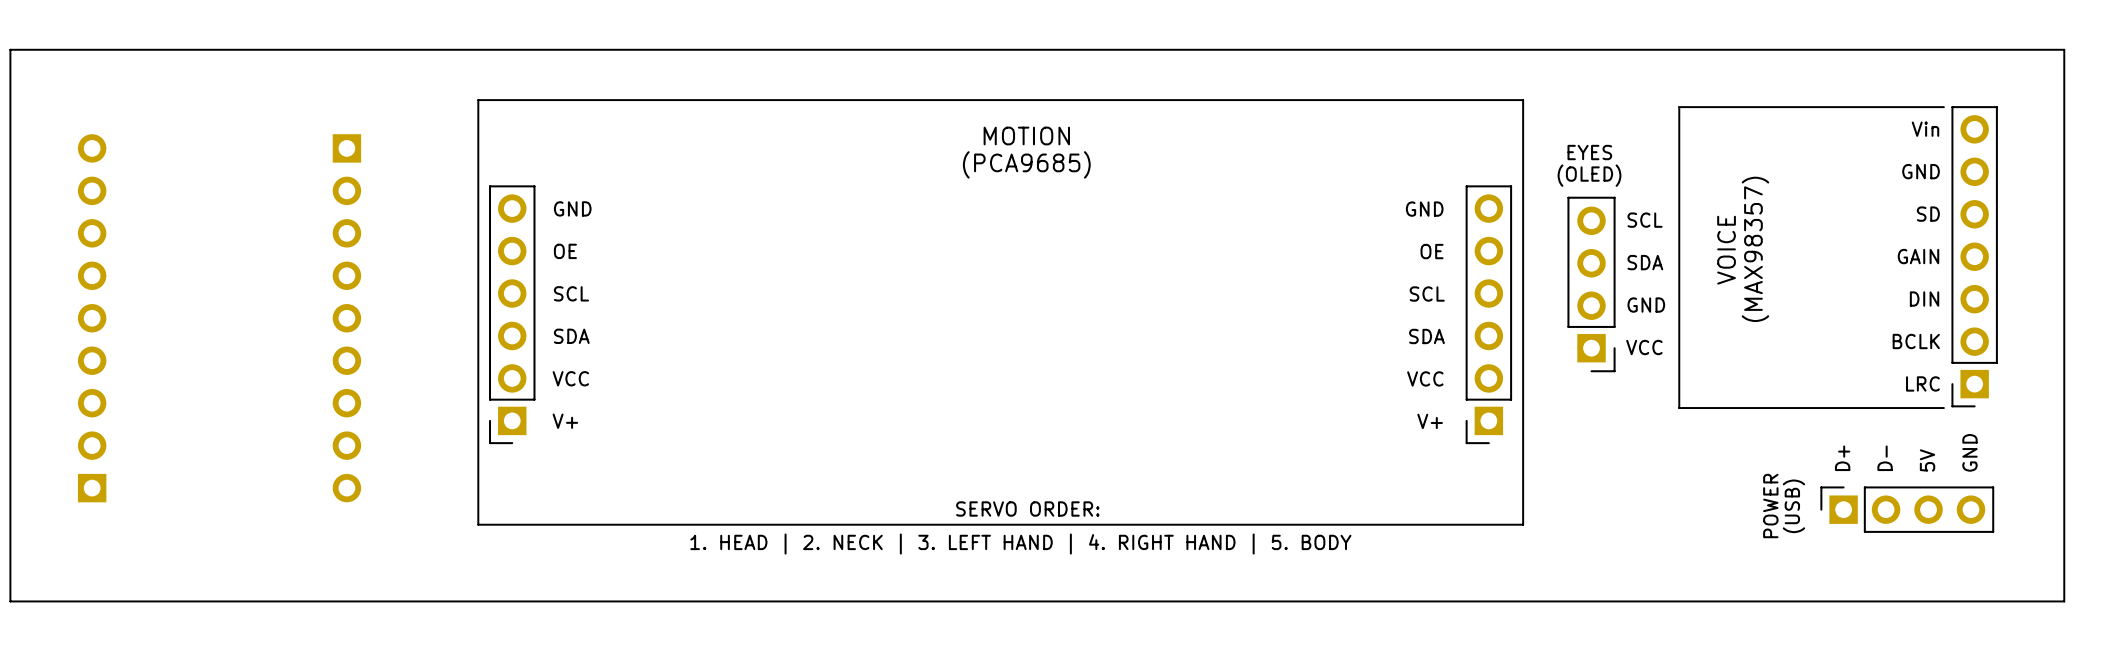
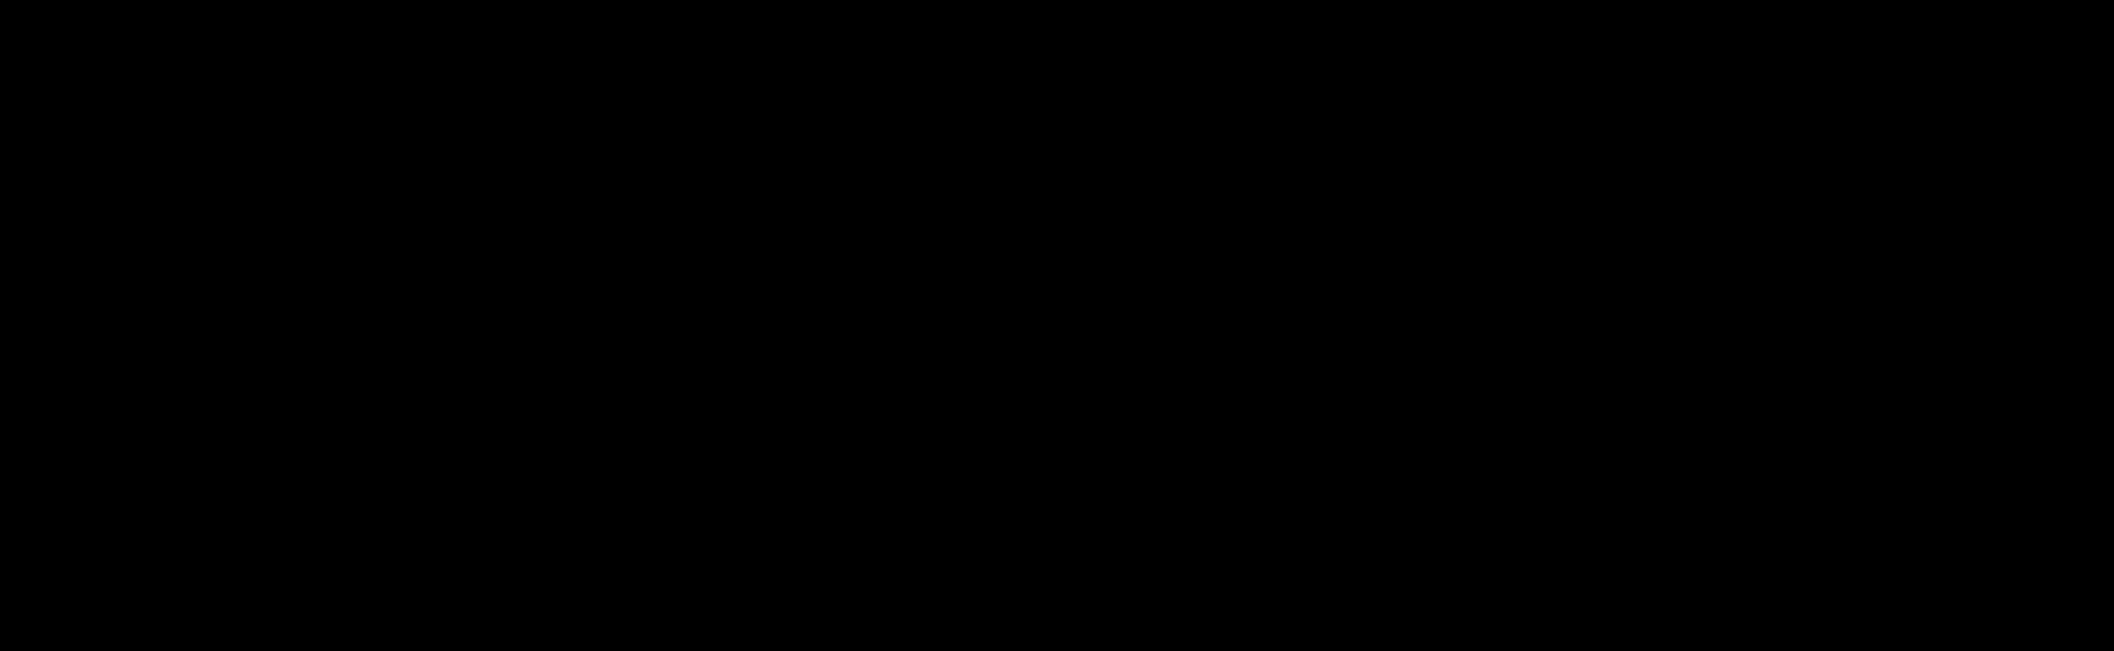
board edge: (10, 49) (2064, 49) (2064, 601) (10, 601) (10, 49) -> none
line: (478, 100) (1523, 100) (1523, 524) (478, 524) (478, 100) -> none
line: (1943, 107) (1679, 107) (1679, 408) (1943, 408) -> none
text: Vin (1925, 129) -> none
text: MOTION (1026, 135) -> none
text: EYES (1589, 152) -> none
text: (PCA9685) (1026, 164) -> none
text: GND (1921, 171) -> none
text: (OLED) (1589, 175) -> none
text: GND (572, 208) -> none
text: GND (1424, 209) -> none
text: SD (1928, 214) -> none
text: SCL (1645, 220) -> none
text: (MAX98357) (1755, 249) -> none
text: VOICE (1726, 250) -> none
text: OE (565, 251) -> none
text: OE (1432, 251) -> none
text: GAIN (1918, 256) -> none
part: (1974, 256) -> none
text: SDA (1645, 262) -> none
part: (1591, 284) -> none
text: SCL (571, 293) -> none
text: SCL (1427, 294) -> none
text: DIN (1924, 299) -> none
text: GND (1646, 305) -> none
part: (512, 314) -> none
part: (1488, 314) -> none
part: (92, 318) -> none
part: (346, 318) -> none
text: SDA (571, 336) -> none
text: SDA (1426, 336) -> none
text: BCLK (1916, 341) -> none
text: VCC (1644, 347) -> none
text: VCC (570, 378) -> none
text: VCC (1425, 378) -> none
text: LRC (1922, 383) -> none
text: V+ (565, 421) -> none
text: V+ (1430, 421) -> none
text: GND (1969, 452) -> none
text: D+ (1842, 458) -> none
text: D- (1885, 458) -> none
text: 5V (1927, 460) -> none
text: POWER (1770, 506) -> none
text: (USB) (1793, 506) -> none
text: SERVO ORDER: (1027, 509) -> none
part: (1907, 509) -> none
text: 1. HEAD | 2. NECK | 3. LEFT HAND | 4. RIGHT HAND | 5. BODY (1020, 544) -> none

